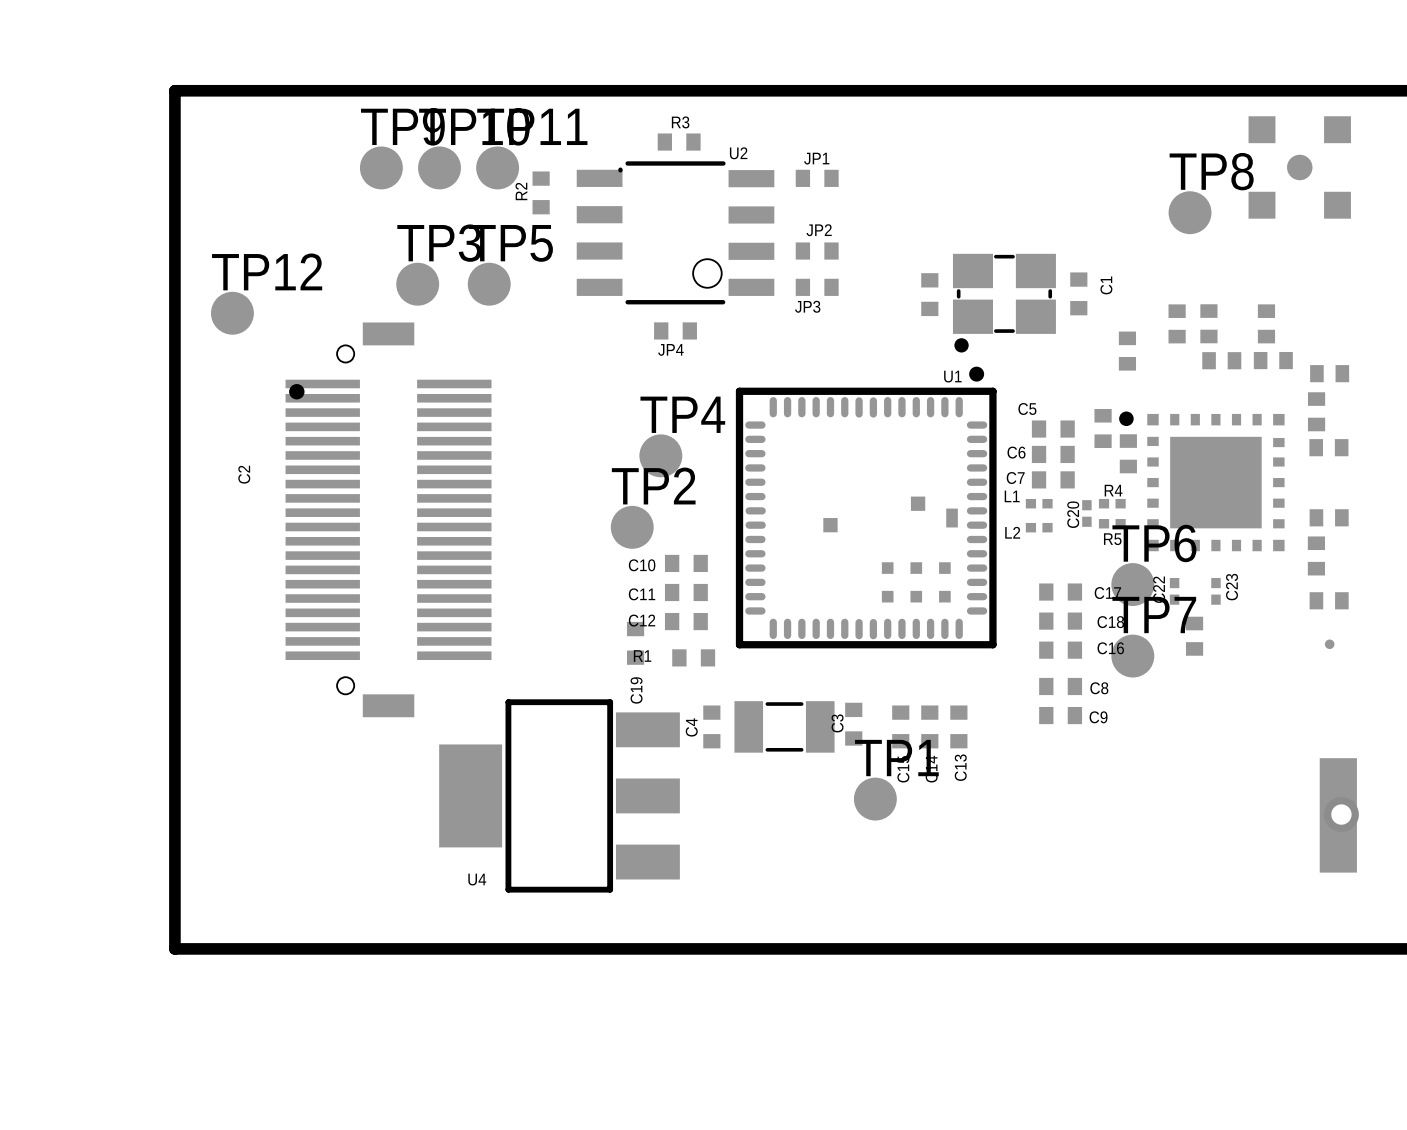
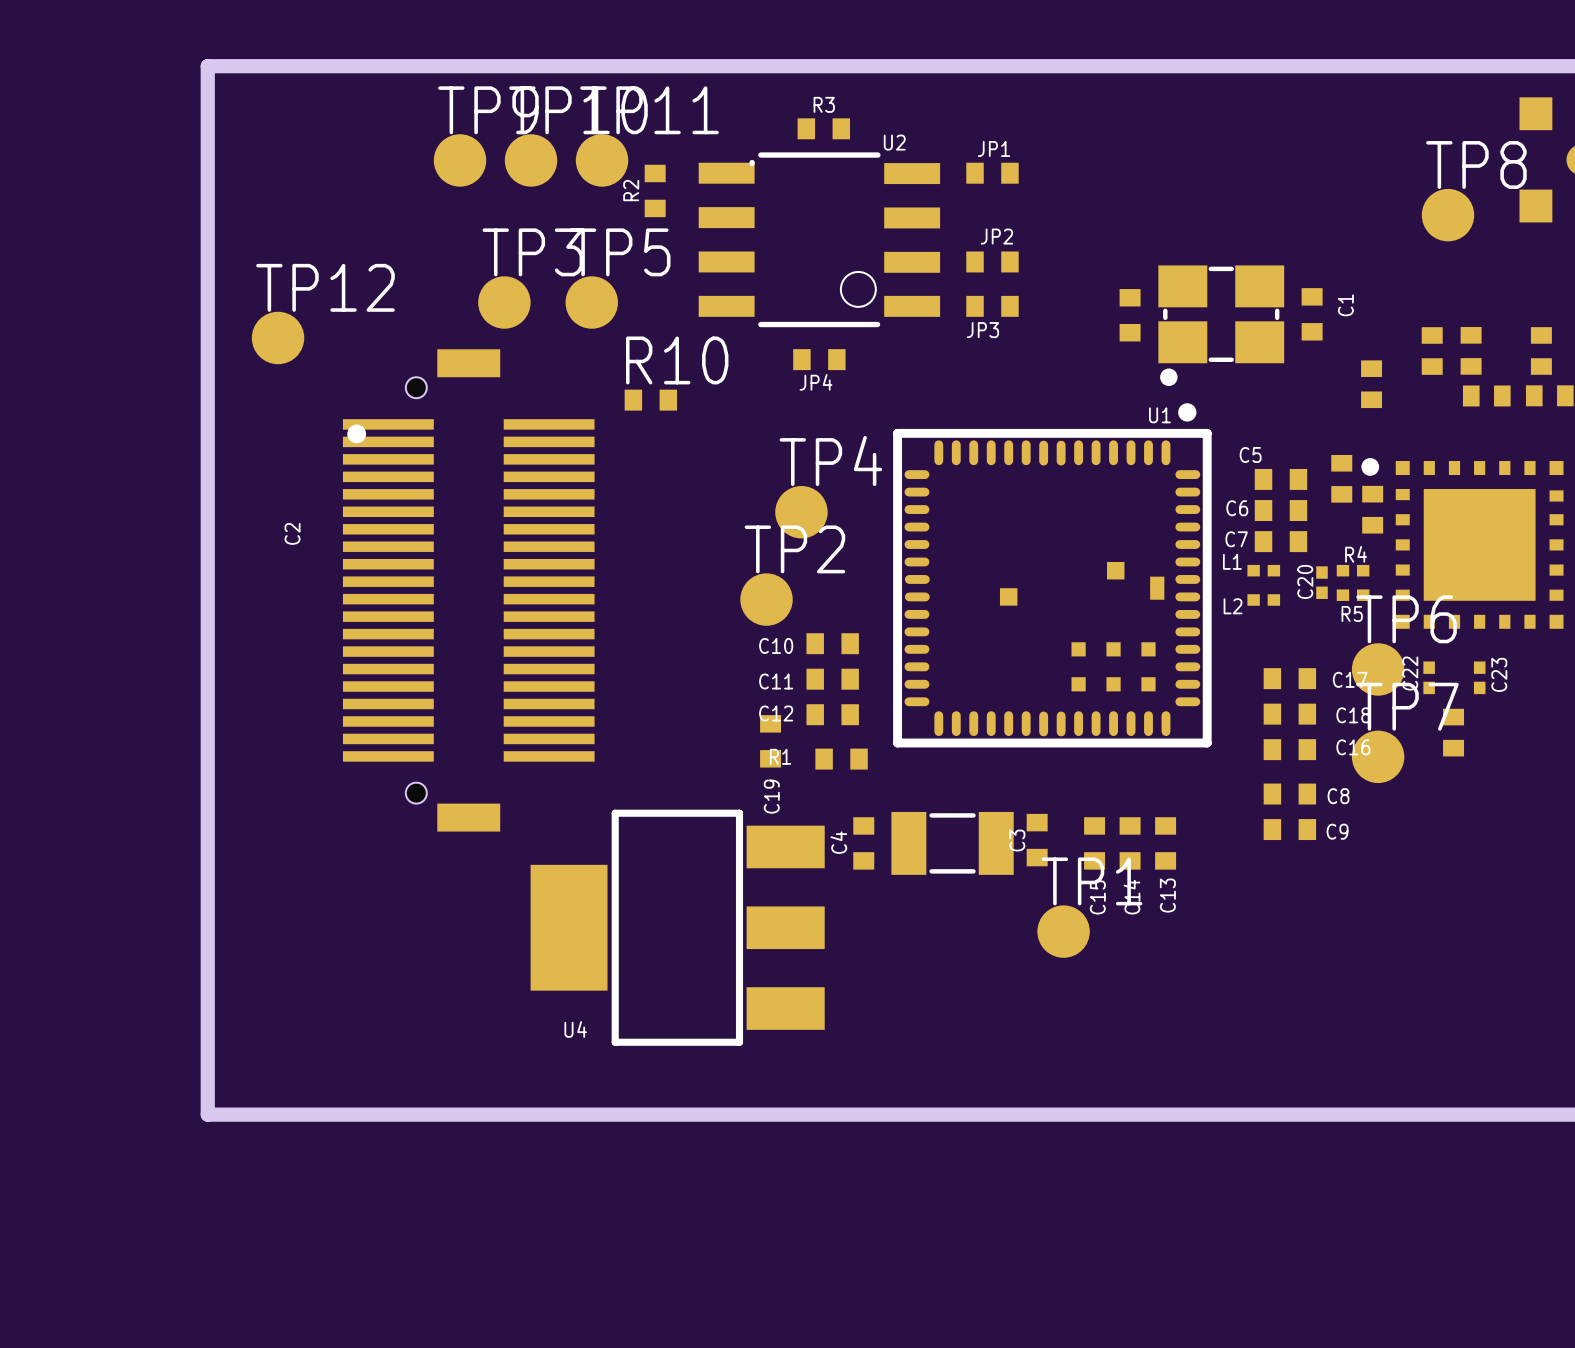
R10: none -> (650, 400)

